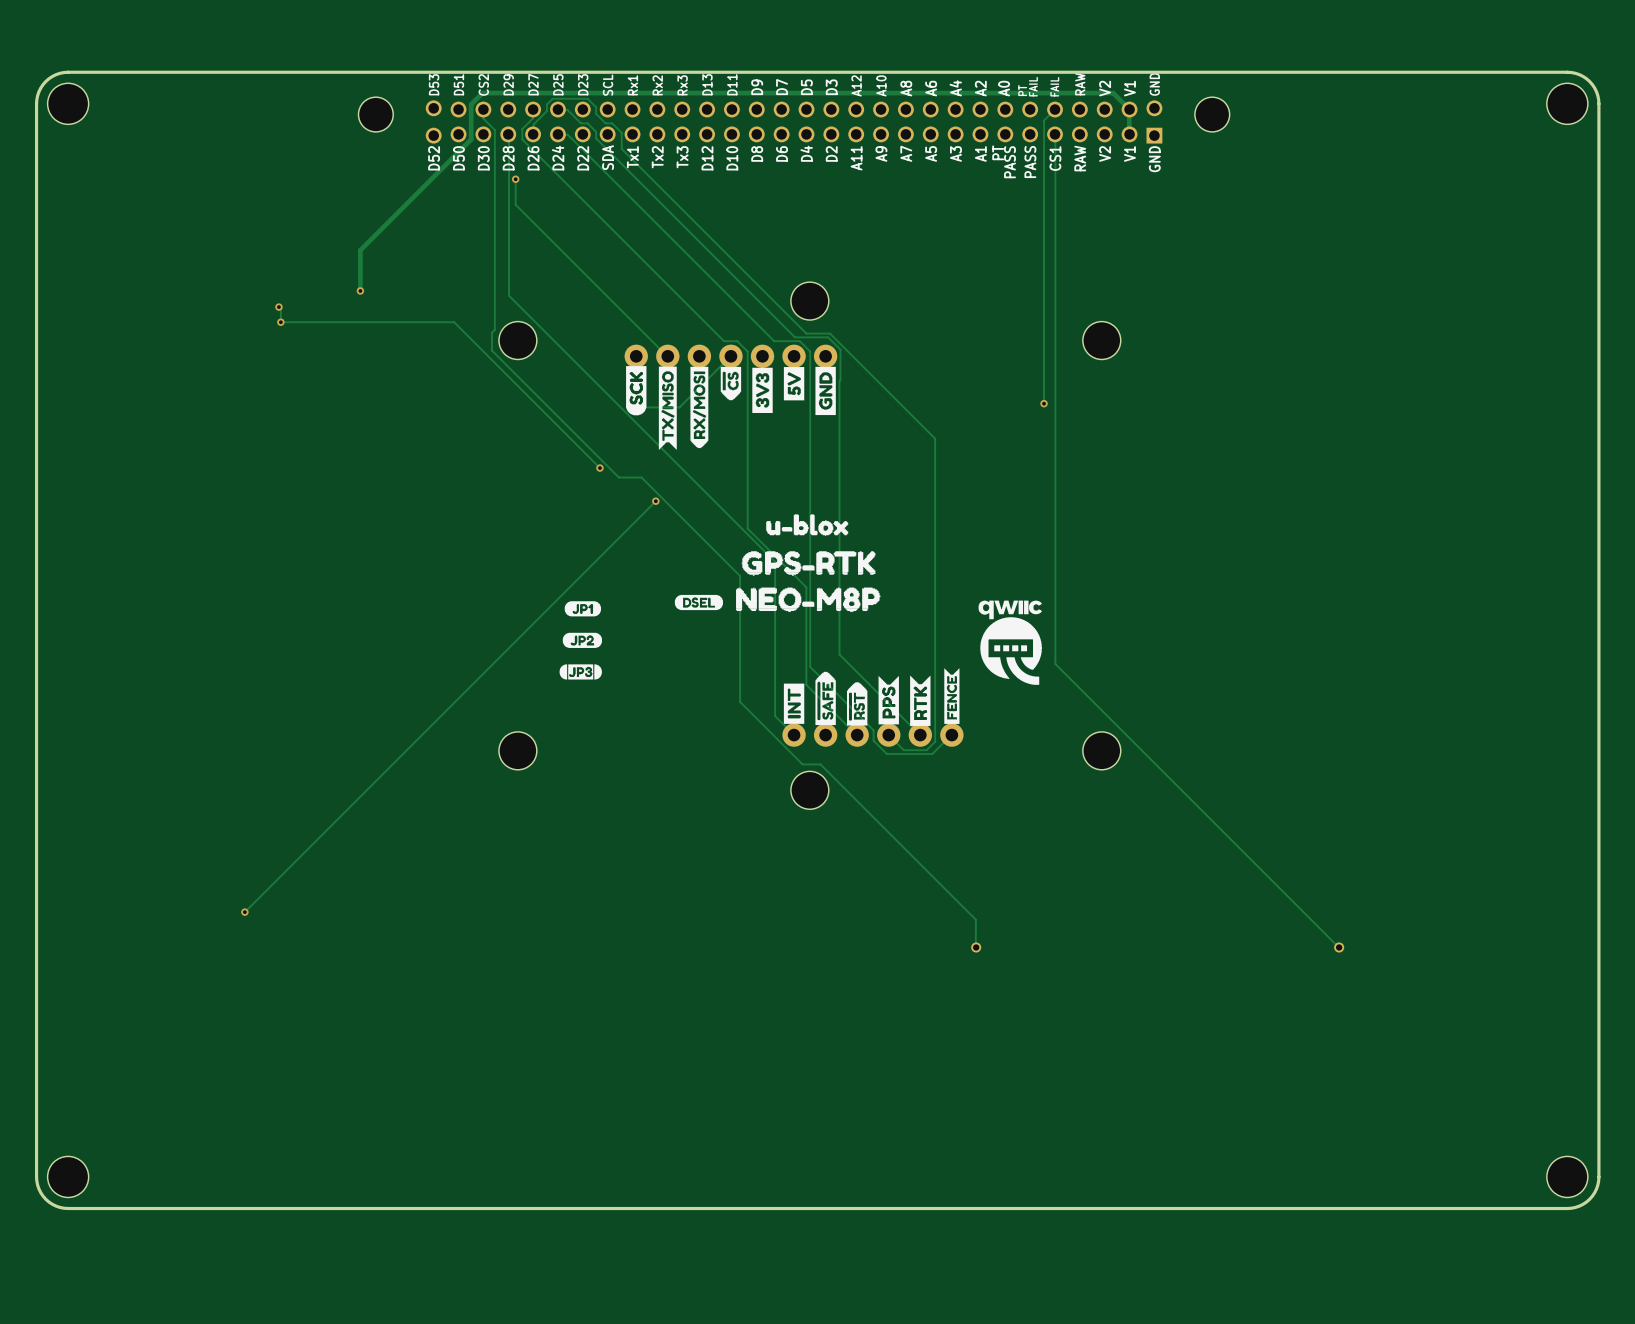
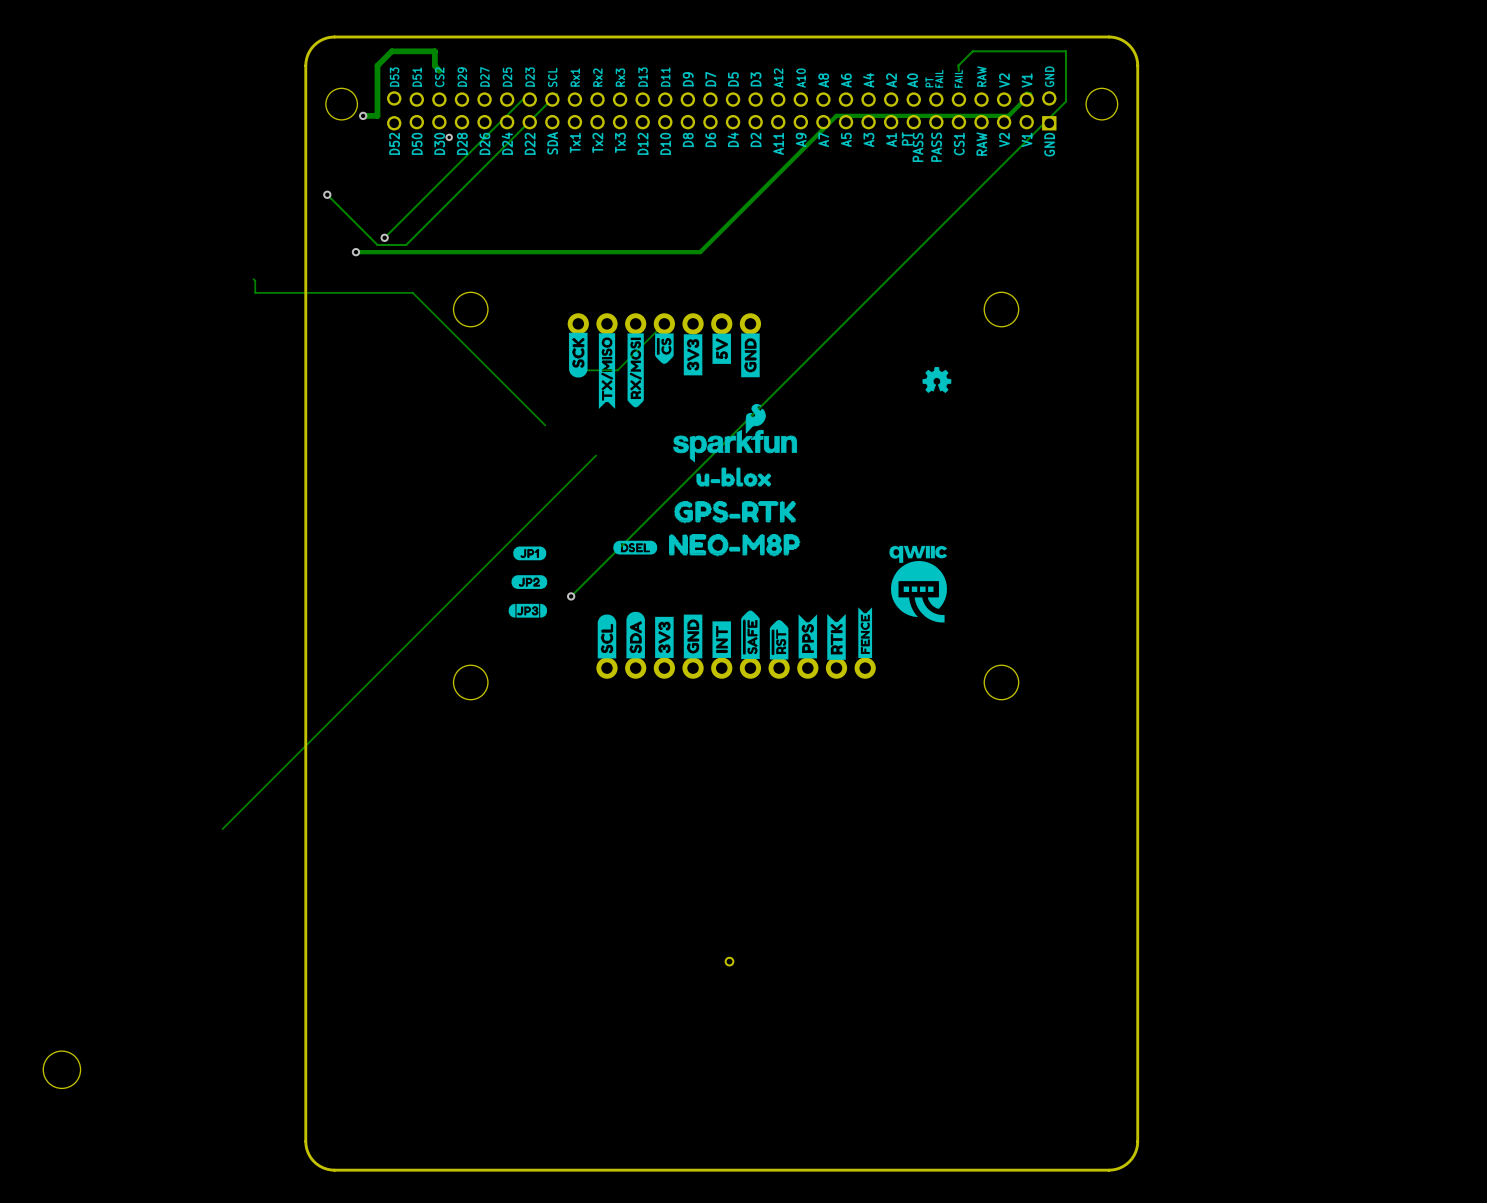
board edge: (1567, 72) (68, 72) (59, 73) (48, 78) (38, 91) (36, 103) (36, 1176) (37, 1185) (43, 1196) (56, 1206) (68, 1208) (1567, 1208) (1575, 1207) (1586, 1201) (1596, 1189) (1598, 1176) (1598, 103) (1596, 91) (1589, 81) (1579, 74) (1567, 72) -> (1109, 36) (1120, 39) (1129, 45) (1135, 54) (1137, 65) (1137, 1141) (1131, 1158) (1120, 1167) (1109, 1170) (334, 1170) (316, 1164) (307, 1152) (305, 1141) (305, 65) (311, 48) (323, 39) (334, 36) (1109, 36)
track: none -> (439, 70) (434, 65) (434, 51) (391, 51) (377, 65) (377, 115) (363, 115)
track: none -> (958, 70) (958, 65) (972, 51) (1066, 51) (1066, 101) (571, 596)
track: none -> (529, 93) (384, 237)
track: none -> (552, 93) (556, 94) (406, 244) (377, 244) (327, 194)
track: none -> (1026, 93) (1030, 94) (1008, 115) (836, 115) (700, 252) (355, 252)
part: (68, 103) -> none
part: (1567, 103) -> none
track: (483, 109) (483, 118) (494, 130) (494, 329) (492, 332) (492, 350) (618, 477) (641, 477) (740, 575) (740, 701) (802, 764) (820, 764) (975, 919) (976, 947) -> none
track: (533, 109) (532, 118) (522, 129) (522, 139) (724, 341) (737, 341) (747, 351) (747, 528) (806, 587) (806, 684) (857, 735) -> none
track: (557, 109) (567, 110) (581, 123) (587, 123) (596, 131) (596, 138) (795, 337) (828, 337) (840, 349) (839, 654) (920, 735) -> none
track: (1055, 109) (1044, 120) (1044, 403) -> none
via: none -> (363, 115)
track: (508, 134) (509, 295) (775, 561) (775, 716) (794, 735) -> none
track: (533, 134) (533, 124) (546, 111) (546, 104) (552, 98) (587, 98) (596, 107) (596, 113) (605, 123) (612, 123) (621, 132) (621, 148) (806, 333) (830, 333) (935, 438) (935, 741) (926, 750) (903, 750) (888, 735) -> none
track: (557, 134) (567, 134) (774, 341) (799, 341) (810, 351) (810, 666) (873, 730) (873, 740) (886, 754) (932, 754) (951, 735) -> none
track: (1055, 134) (1055, 664) (1339, 947) -> none
track: (1129, 134) (1129, 109) (1113, 93) (482, 93) (471, 104) (471, 139) (360, 250) (360, 290) -> none
via: none -> (449, 137)
track: (515, 179) (515, 204) (667, 356) -> none
via: (515, 179) -> none
via: none -> (327, 194)
via: none -> (384, 237)
via: none -> (355, 252)
via: (360, 290) -> none
part: (809, 301) -> none
via: (278, 307) -> none
via: (280, 322) -> none
drawing: none -> [922, 367, 952, 393]
via: (1044, 403) -> none
drawing: none -> [673, 403, 798, 463]
via: (599, 468) -> none
via: (655, 501) -> none
via: none -> (571, 596)
drawing: none -> [597, 611, 703, 659]
part: none -> (650, 668)
part: (809, 790) -> none
via: (244, 912) -> none
part: (976, 947) -> none
part: (1339, 947) -> none
part: none -> (729, 961)
part: (1567, 1176) -> none

